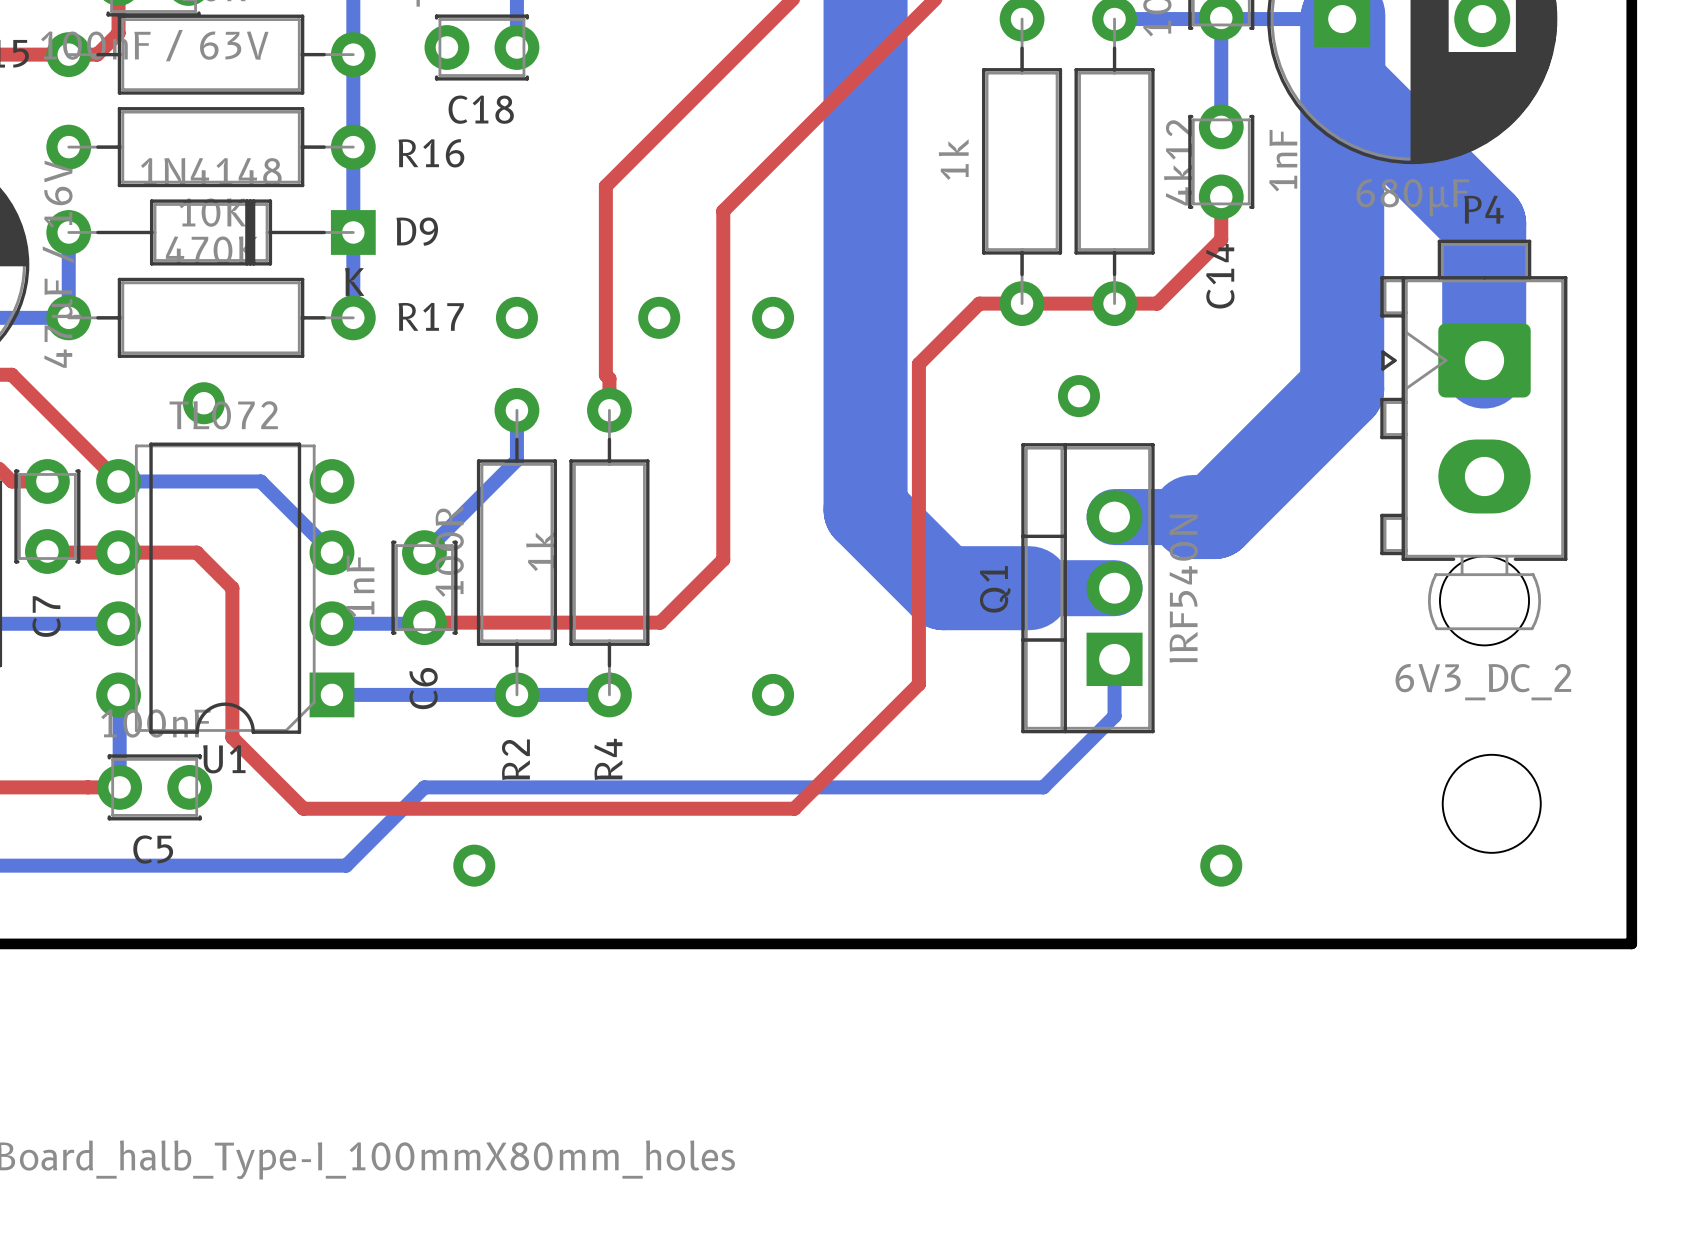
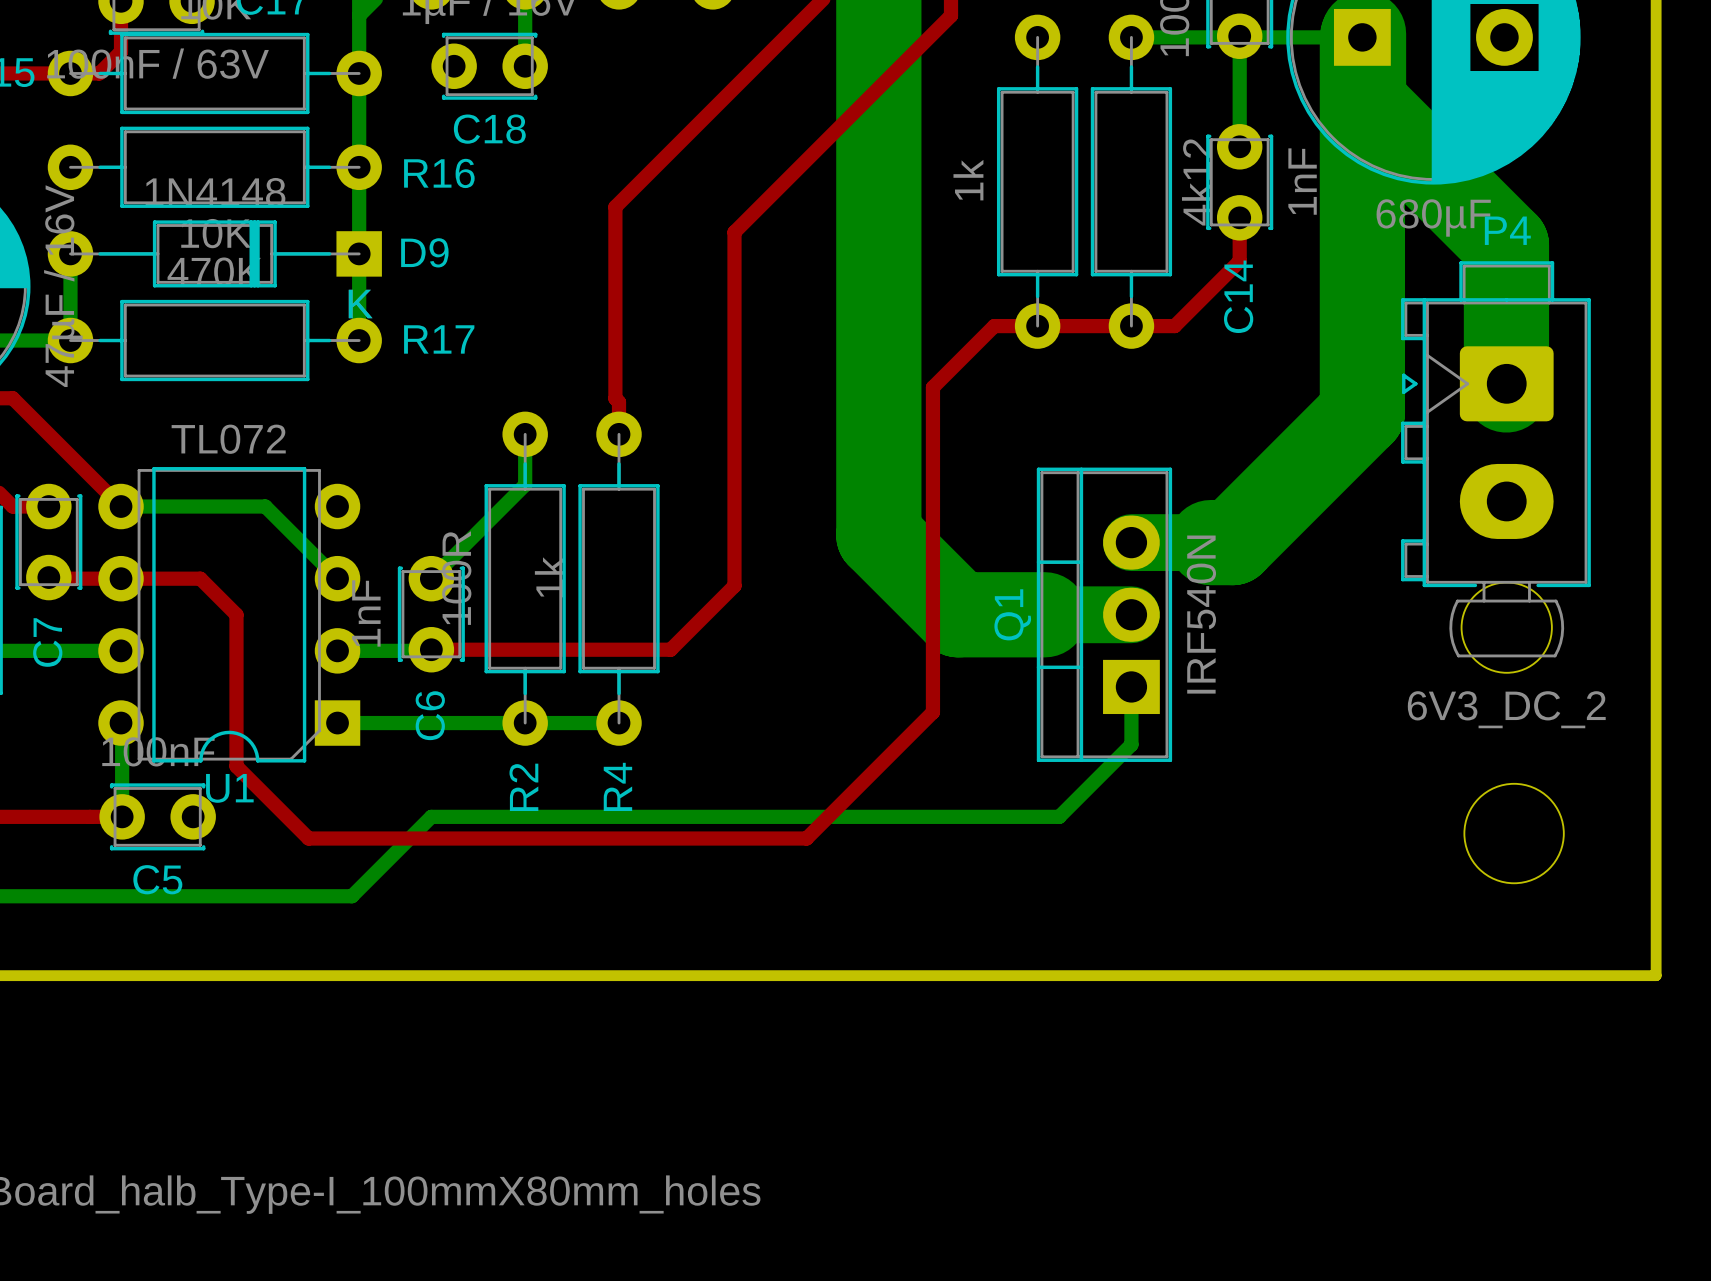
via: (516, 317) -> none
via: (659, 317) -> none
via: (773, 317) -> none
via: (1078, 396) -> none
via: (203, 403) -> none
via: (773, 694) -> none
via: (474, 865) -> none
via: (1221, 865) -> none

